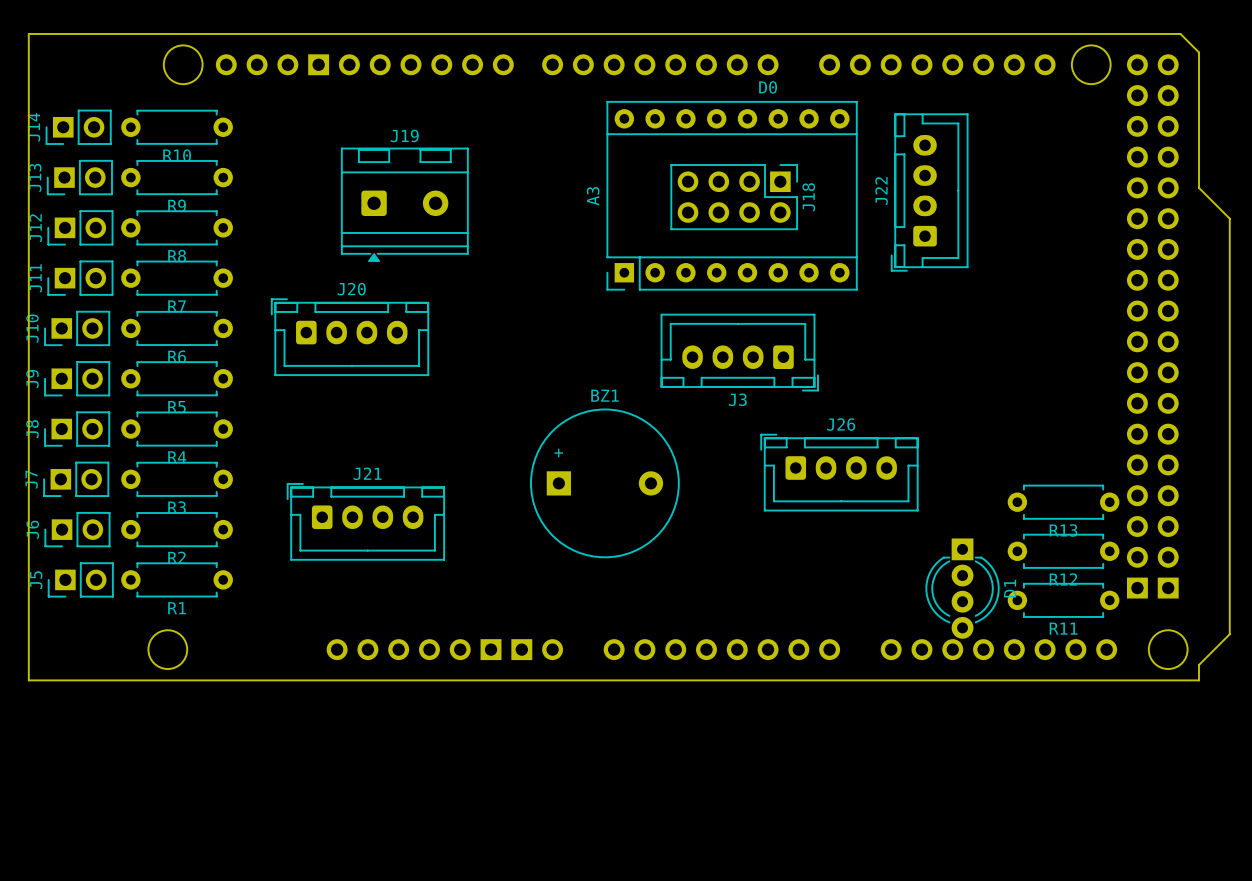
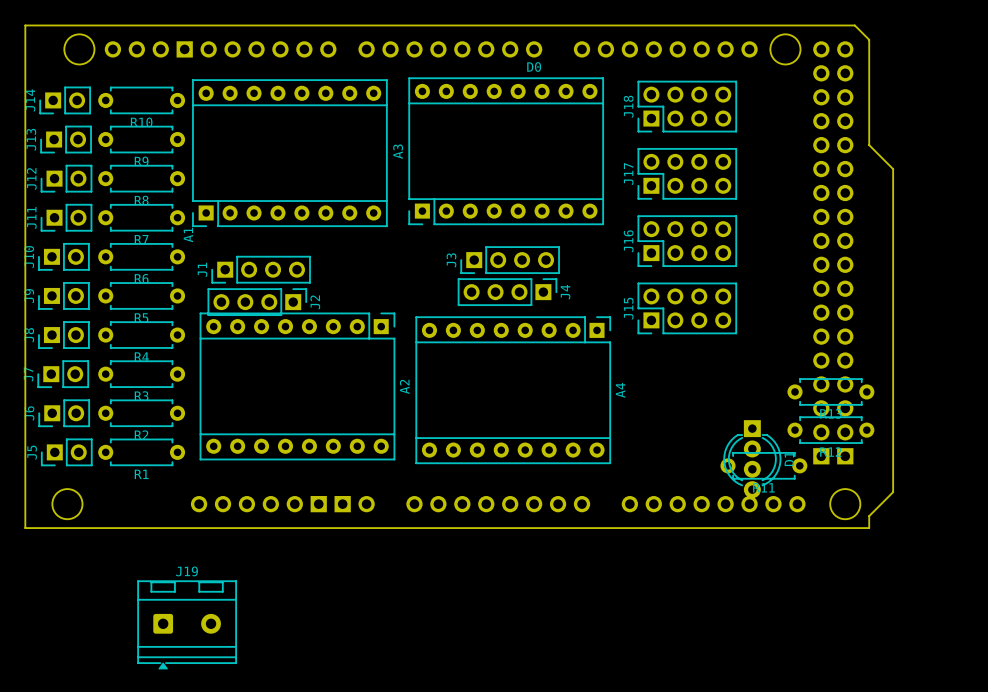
J22: (929, 192) -> none
A1: none -> (289, 153)
A3 position: (732, 195) -> (506, 151)
J18 rotation: 0° (734, 197) -> 180° (687, 106)
J18 position: (734, 197) -> (687, 106)
J19 position: (404, 204) -> (187, 625)
J17: none -> (687, 173)
J16: none -> (687, 241)
J3 footprint: [660, 313, 819, 392] -> [460, 246, 560, 274]
J20: (350, 337) -> none
J1: none -> (261, 269)
part: none -> (459, 276)
part: (629, 357) -> none
J4: none -> (507, 292)
J2: none -> (257, 302)
J15: none -> (687, 308)
J3 name position: J3 (737, 399) -> J3 (451, 260)
J26: (839, 472) -> none
BZ1: (604, 483) -> none
A2: none -> (297, 386)
A4: none -> (513, 390)
J21: (365, 521) -> none
R11 position: (1063, 600) -> (763, 465)

